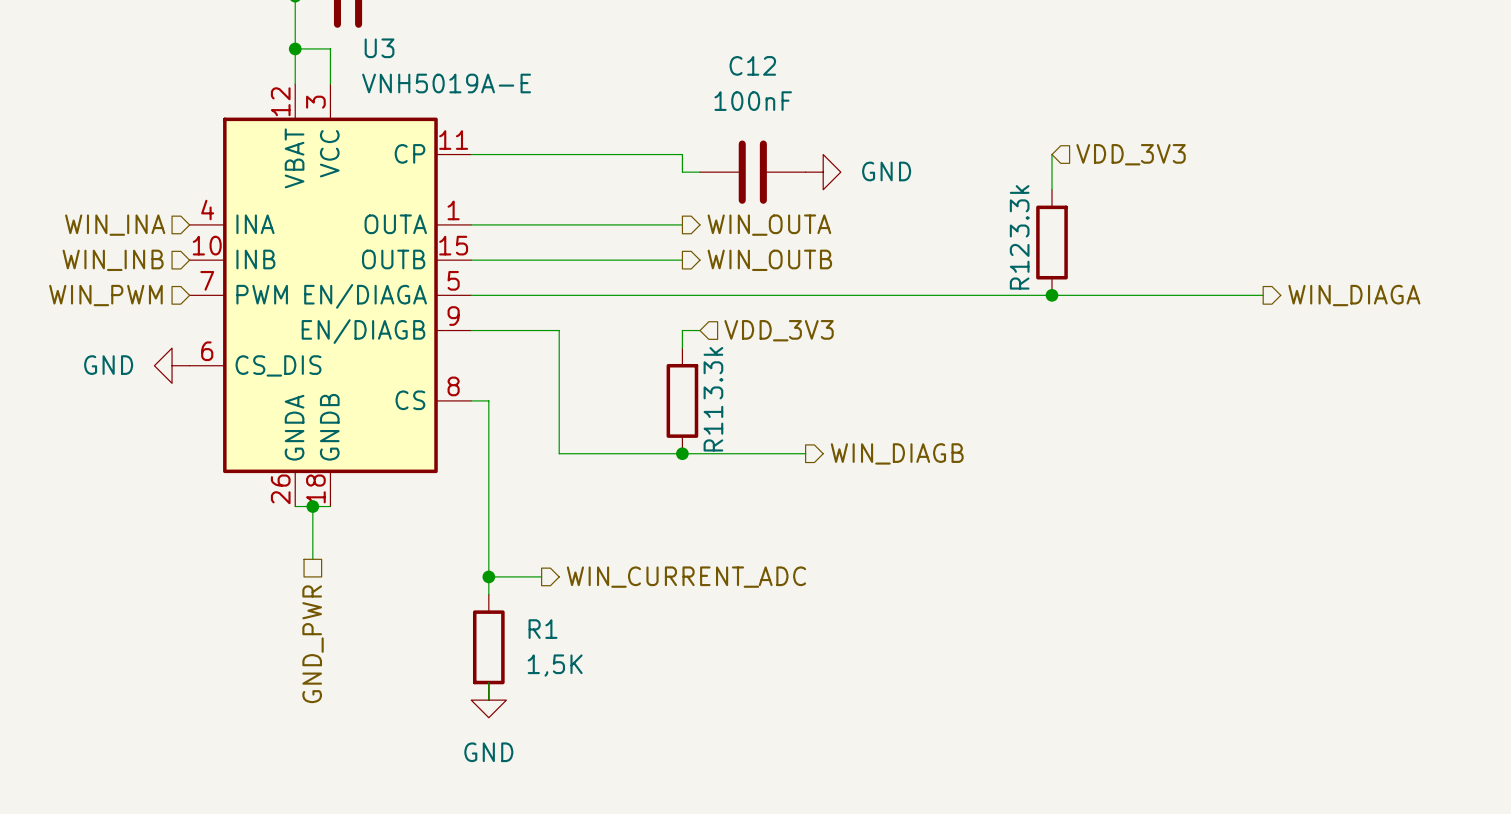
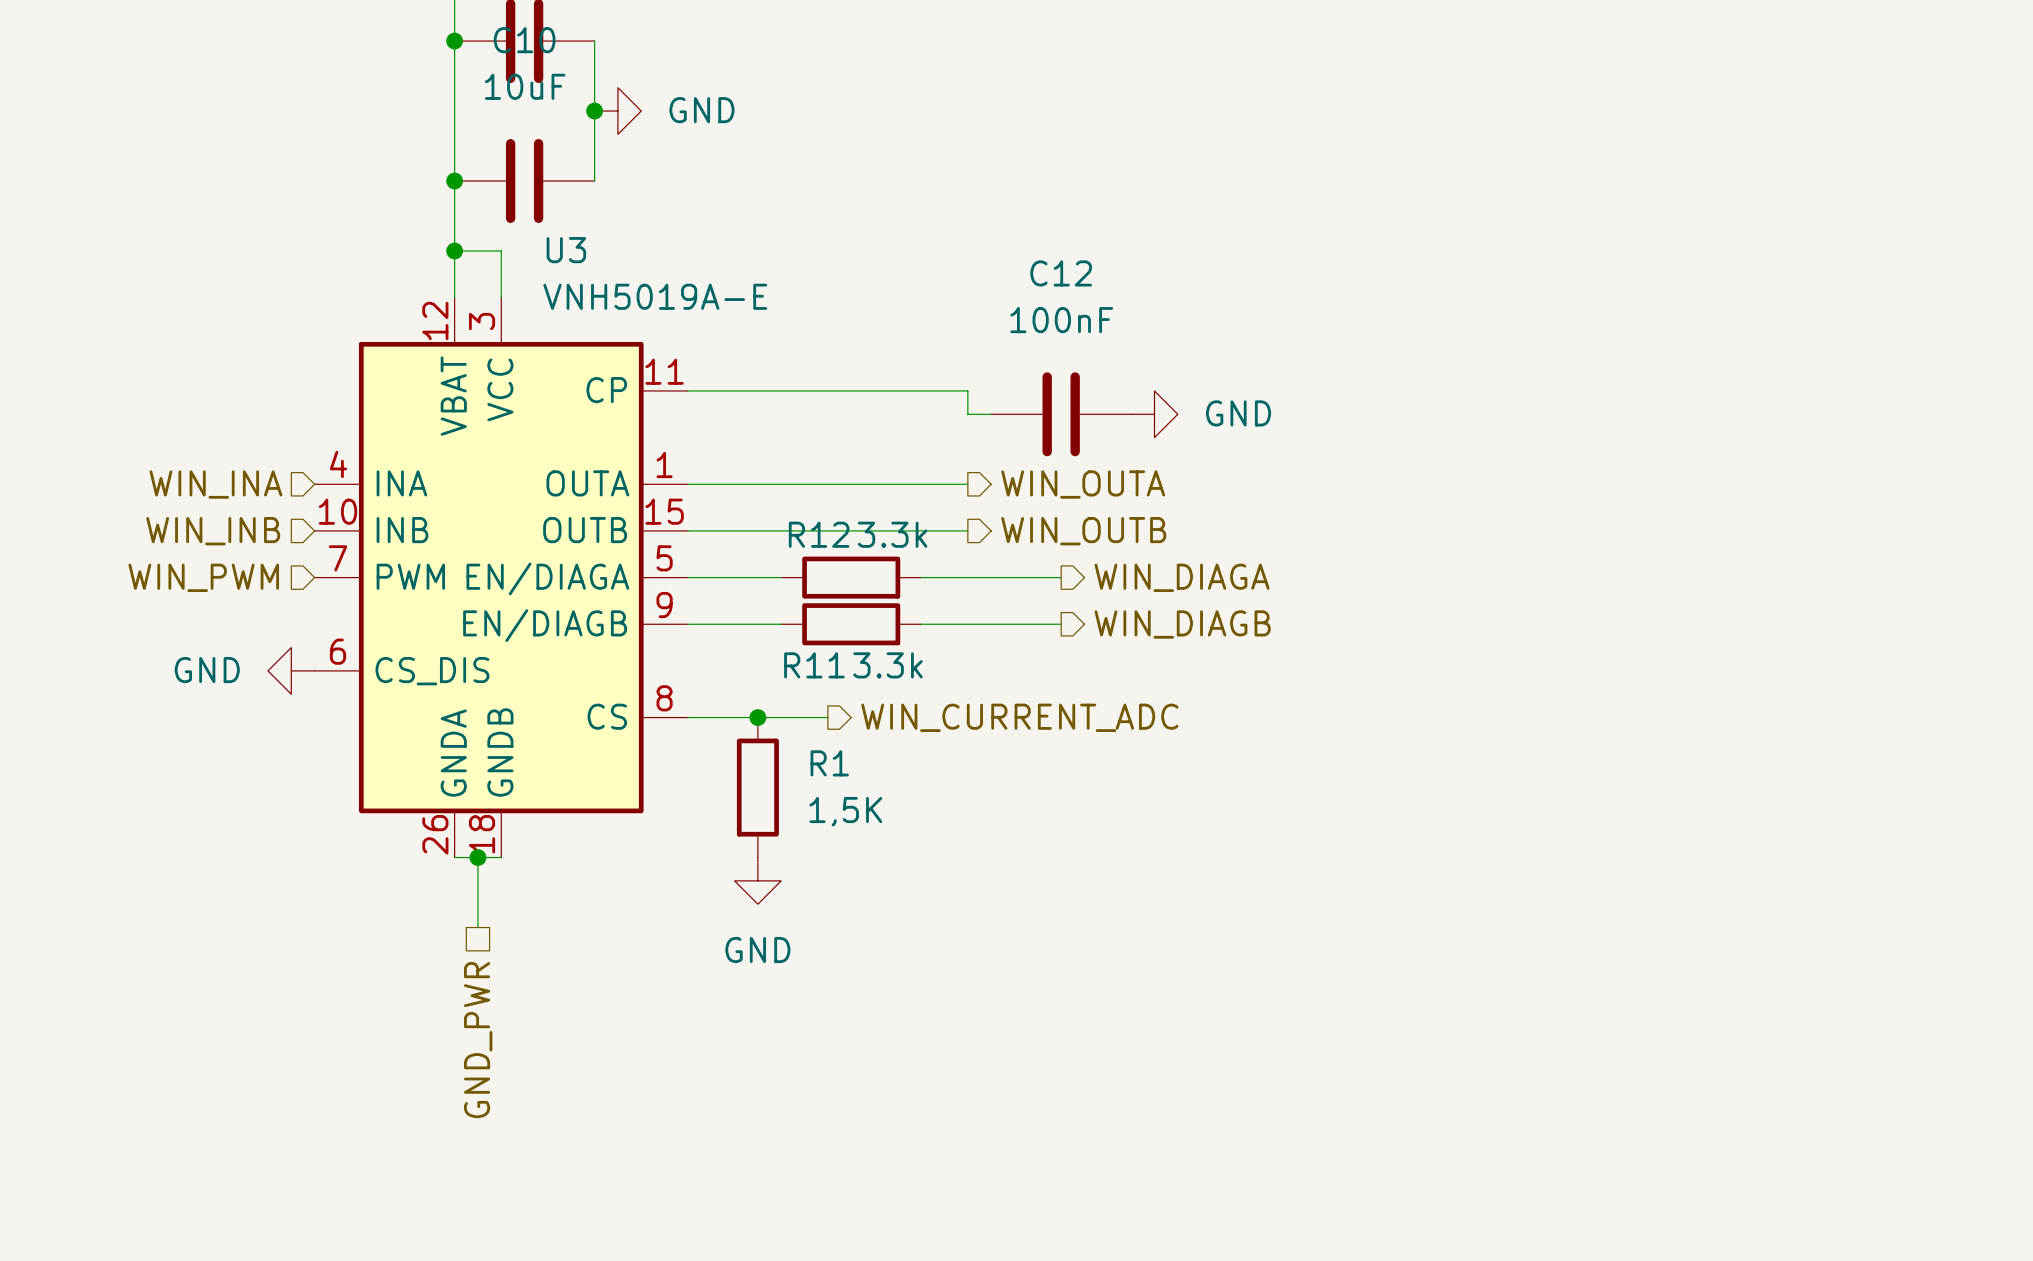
wire: (1051, 154) (1051, 189) -> none
hierarchical label: VDD_3V3 (1131, 154) -> none
R12 rotation: 0° (1051, 242) -> 90° clockwise (851, 577)
R12 position: (1051, 242) -> (851, 577)
wire: (541, 295) (647, 295) -> none
wire: (752, 295) (1263, 295) -> none
hierarchical label: none -> WIN_DIAGA (1182, 577)
junction: (1051, 295) -> none
hierarchical label: WIN_DIAGA (1354, 295) -> none
wire: (541, 330) (559, 330) (559, 453) (805, 453) -> none
wire: (682, 330) (682, 348) -> (967, 624) (921, 624)
hierarchical label: VDD_3V3 (779, 330) -> none
wire: (488, 400) (488, 594) -> (711, 717) (827, 717)
junction: none -> (757, 717)
R11 rotation: 0° (682, 400) -> 90° clockwise (851, 624)
R11 position: (682, 400) -> (851, 624)
junction: (682, 453) -> none
hierarchical label position: WIN_DIAGB (897, 453) -> WIN_DIAGB (1182, 624)
wire: (488, 576) (541, 576) -> (991, 624) (1061, 624)
junction: (488, 576) -> none
hierarchical label position: WIN_CURRENT_ADC (686, 577) -> WIN_CURRENT_ADC (1019, 717)
R1 position: (488, 647) -> (757, 787)
wire: (488, 682) (488, 700) -> none
power symbol position: GND (488, 700) -> GND (757, 880)

